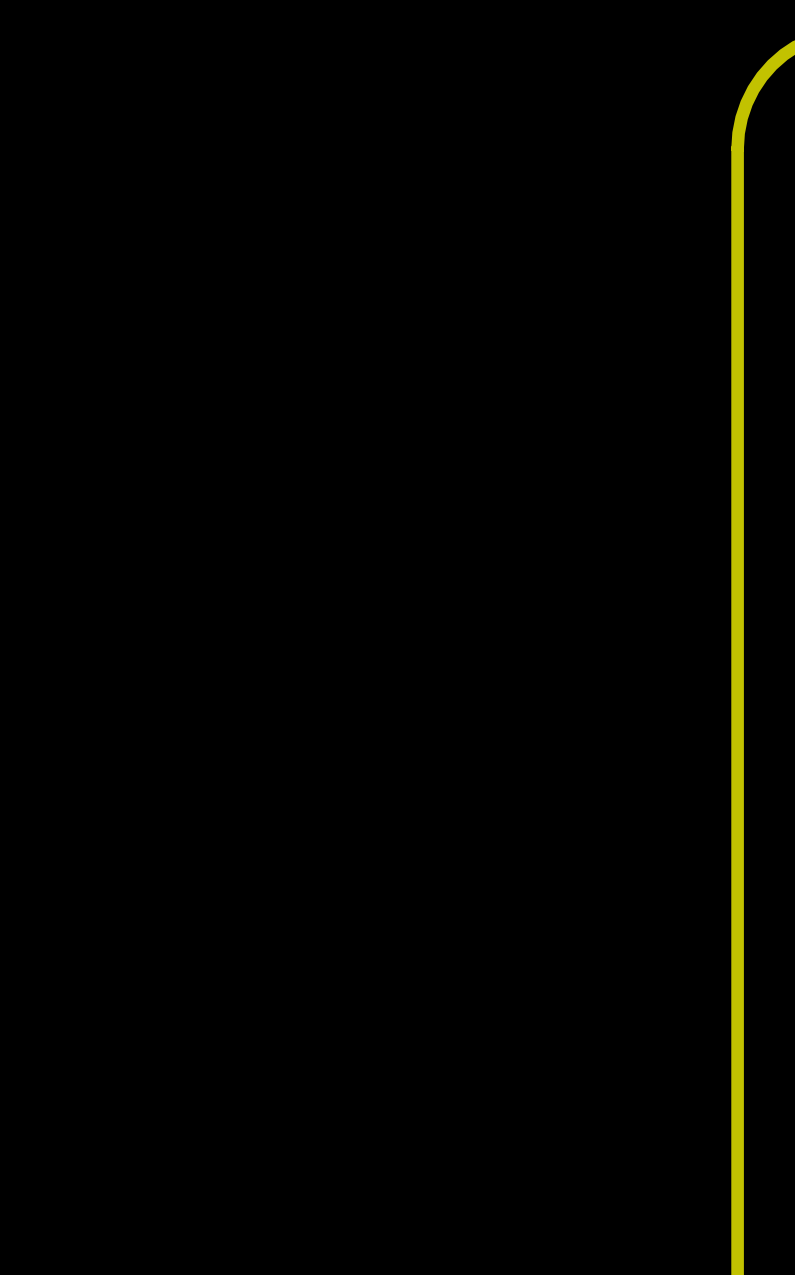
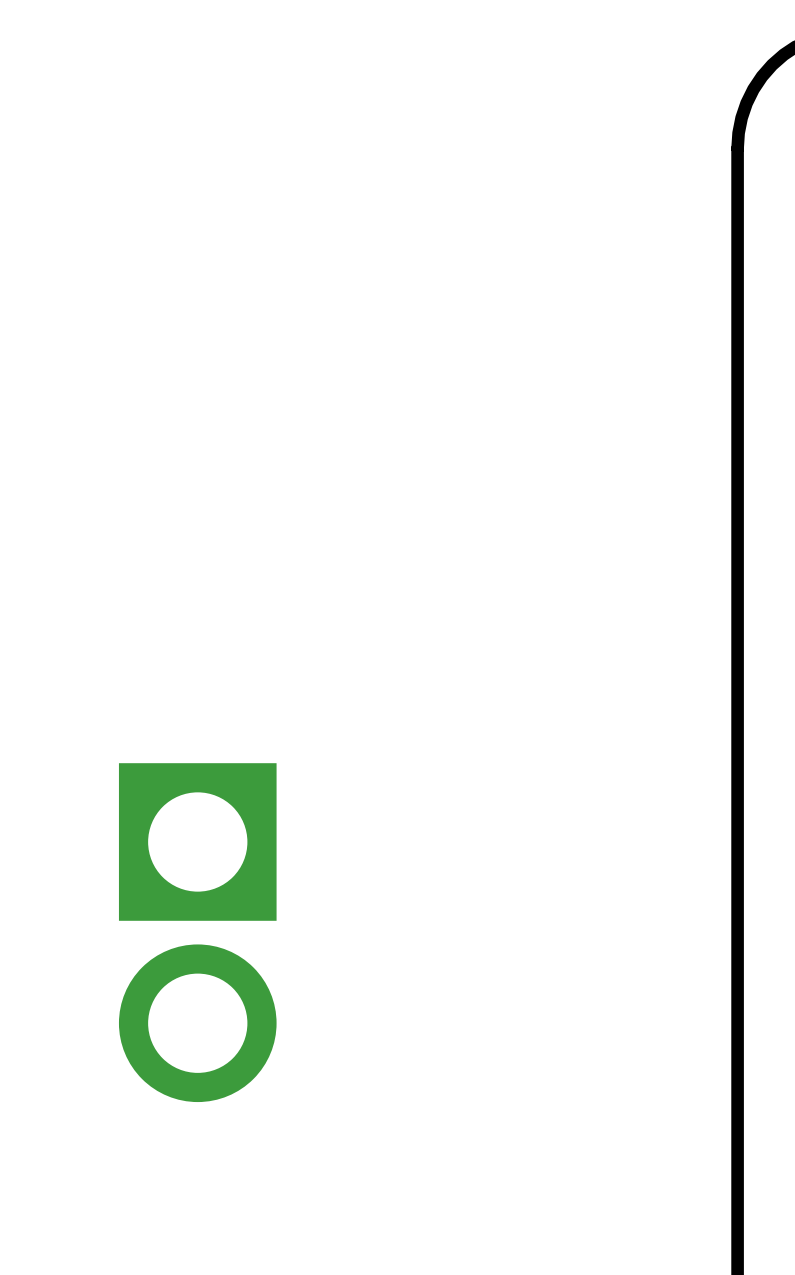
part: none -> (197, 932)

